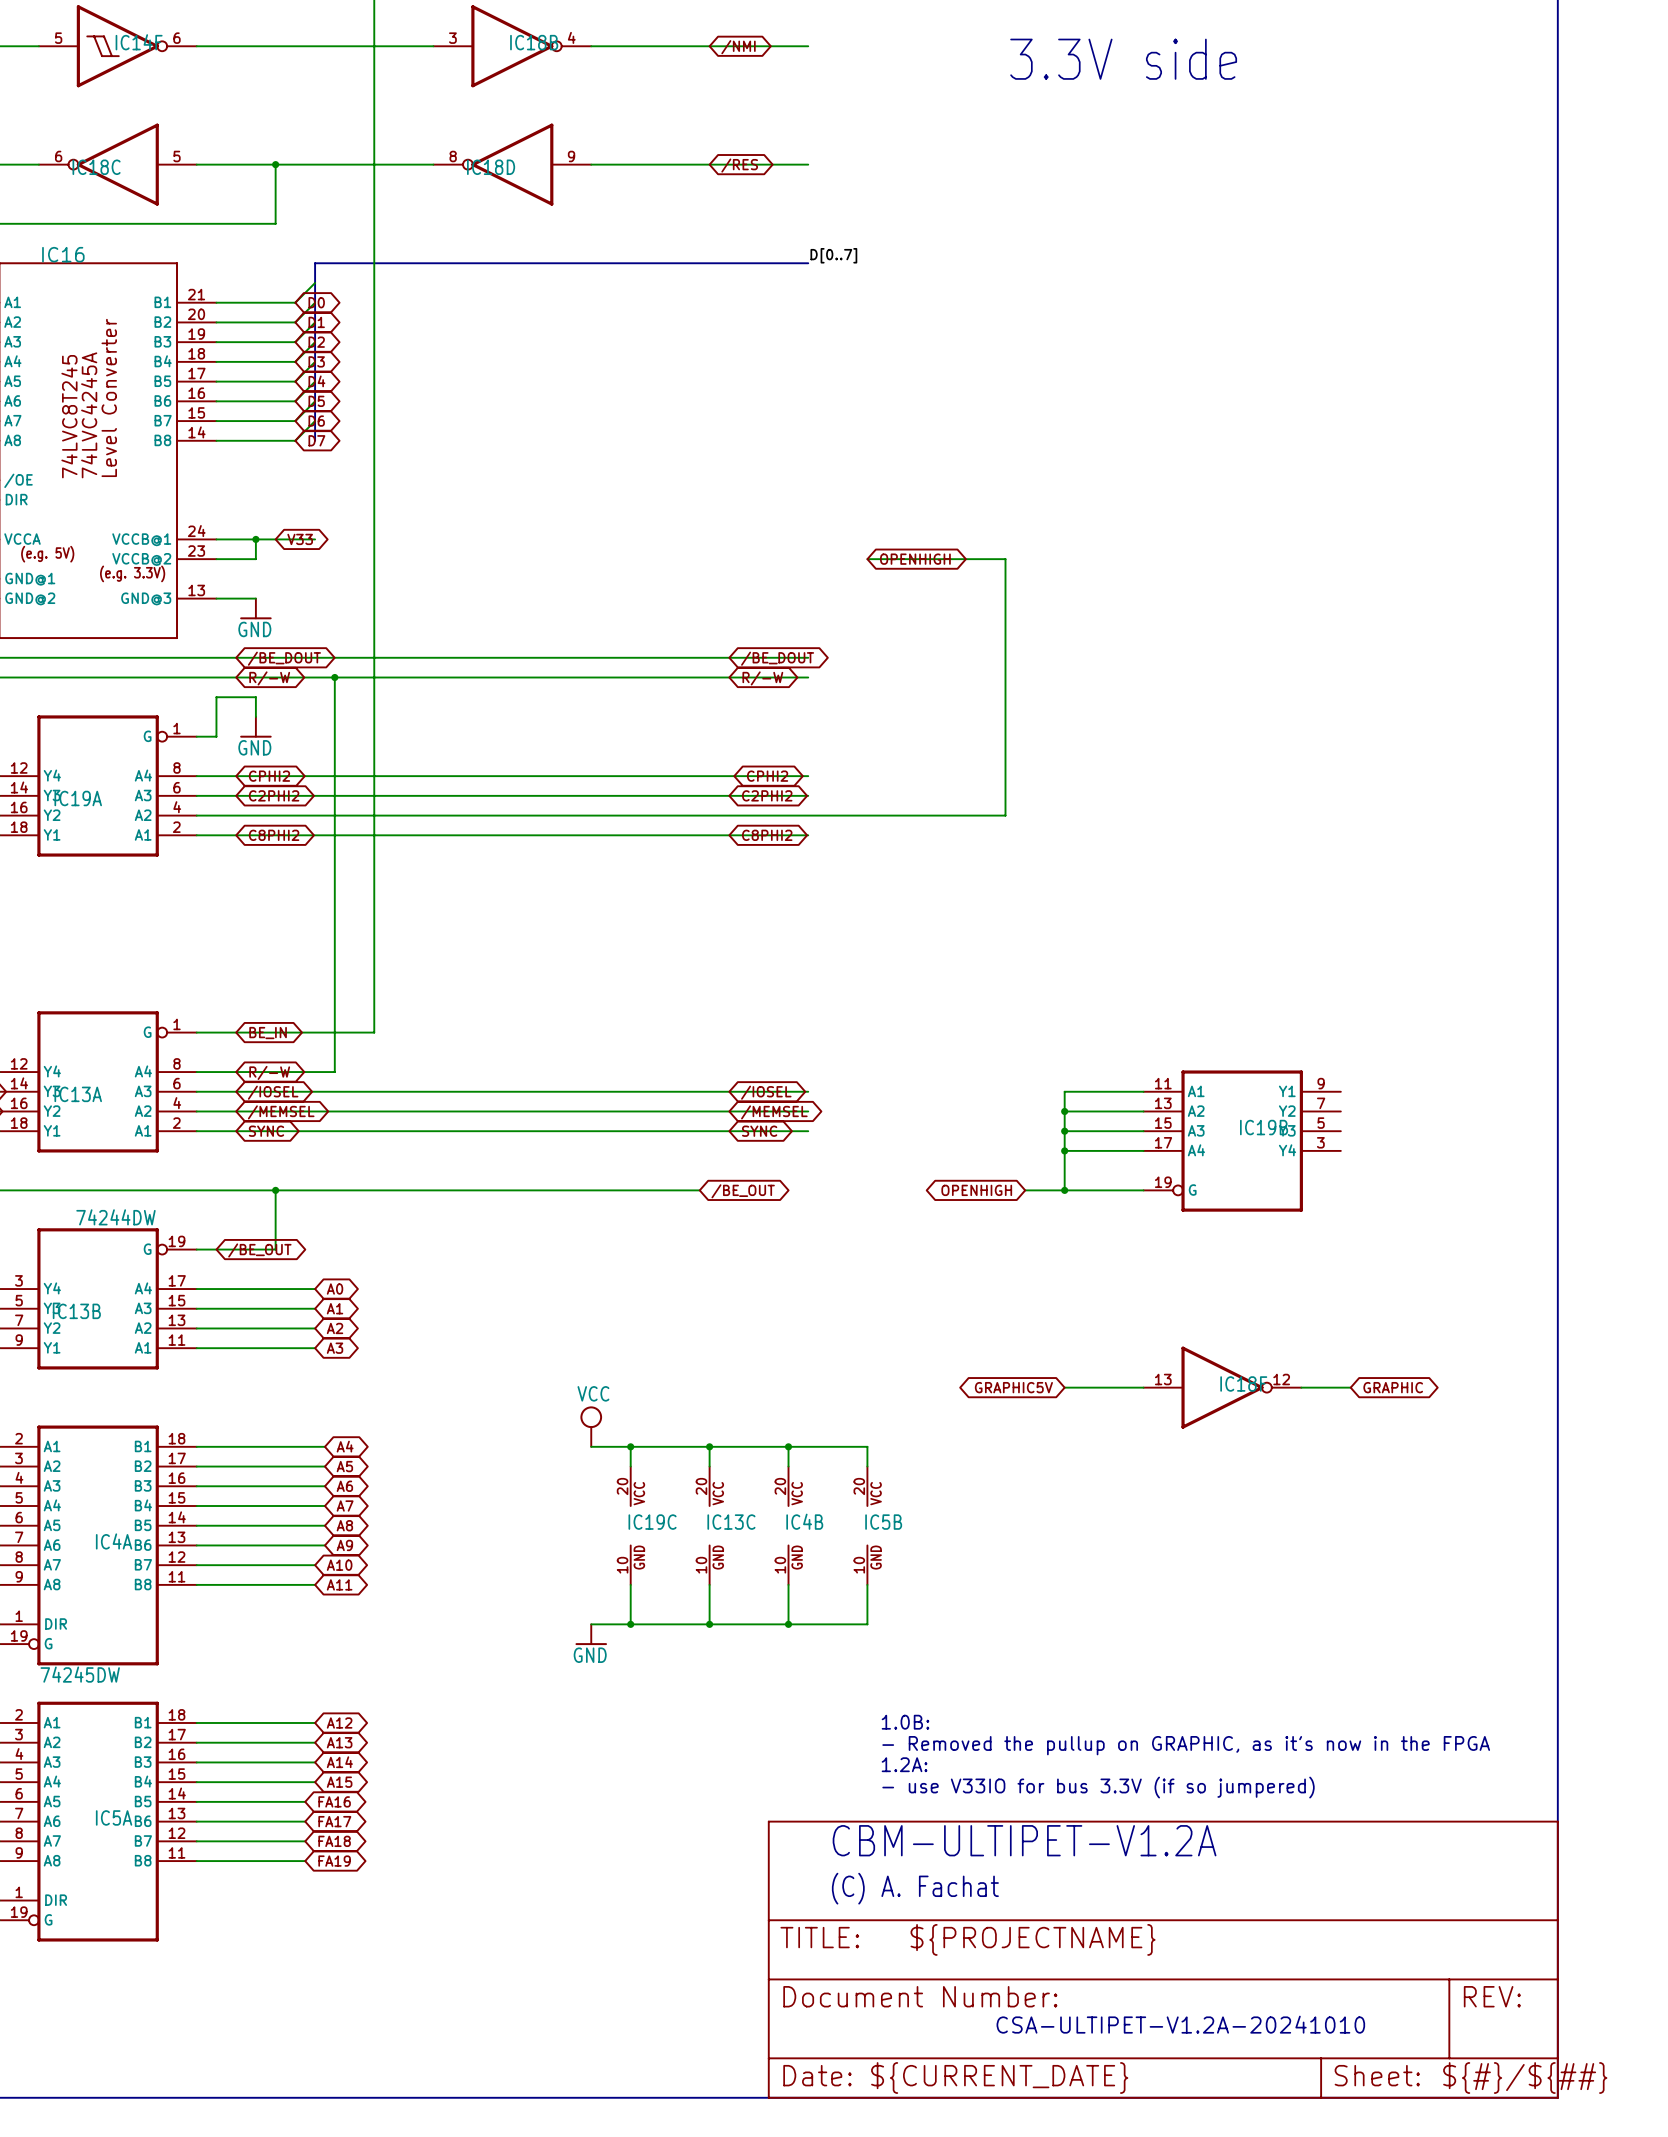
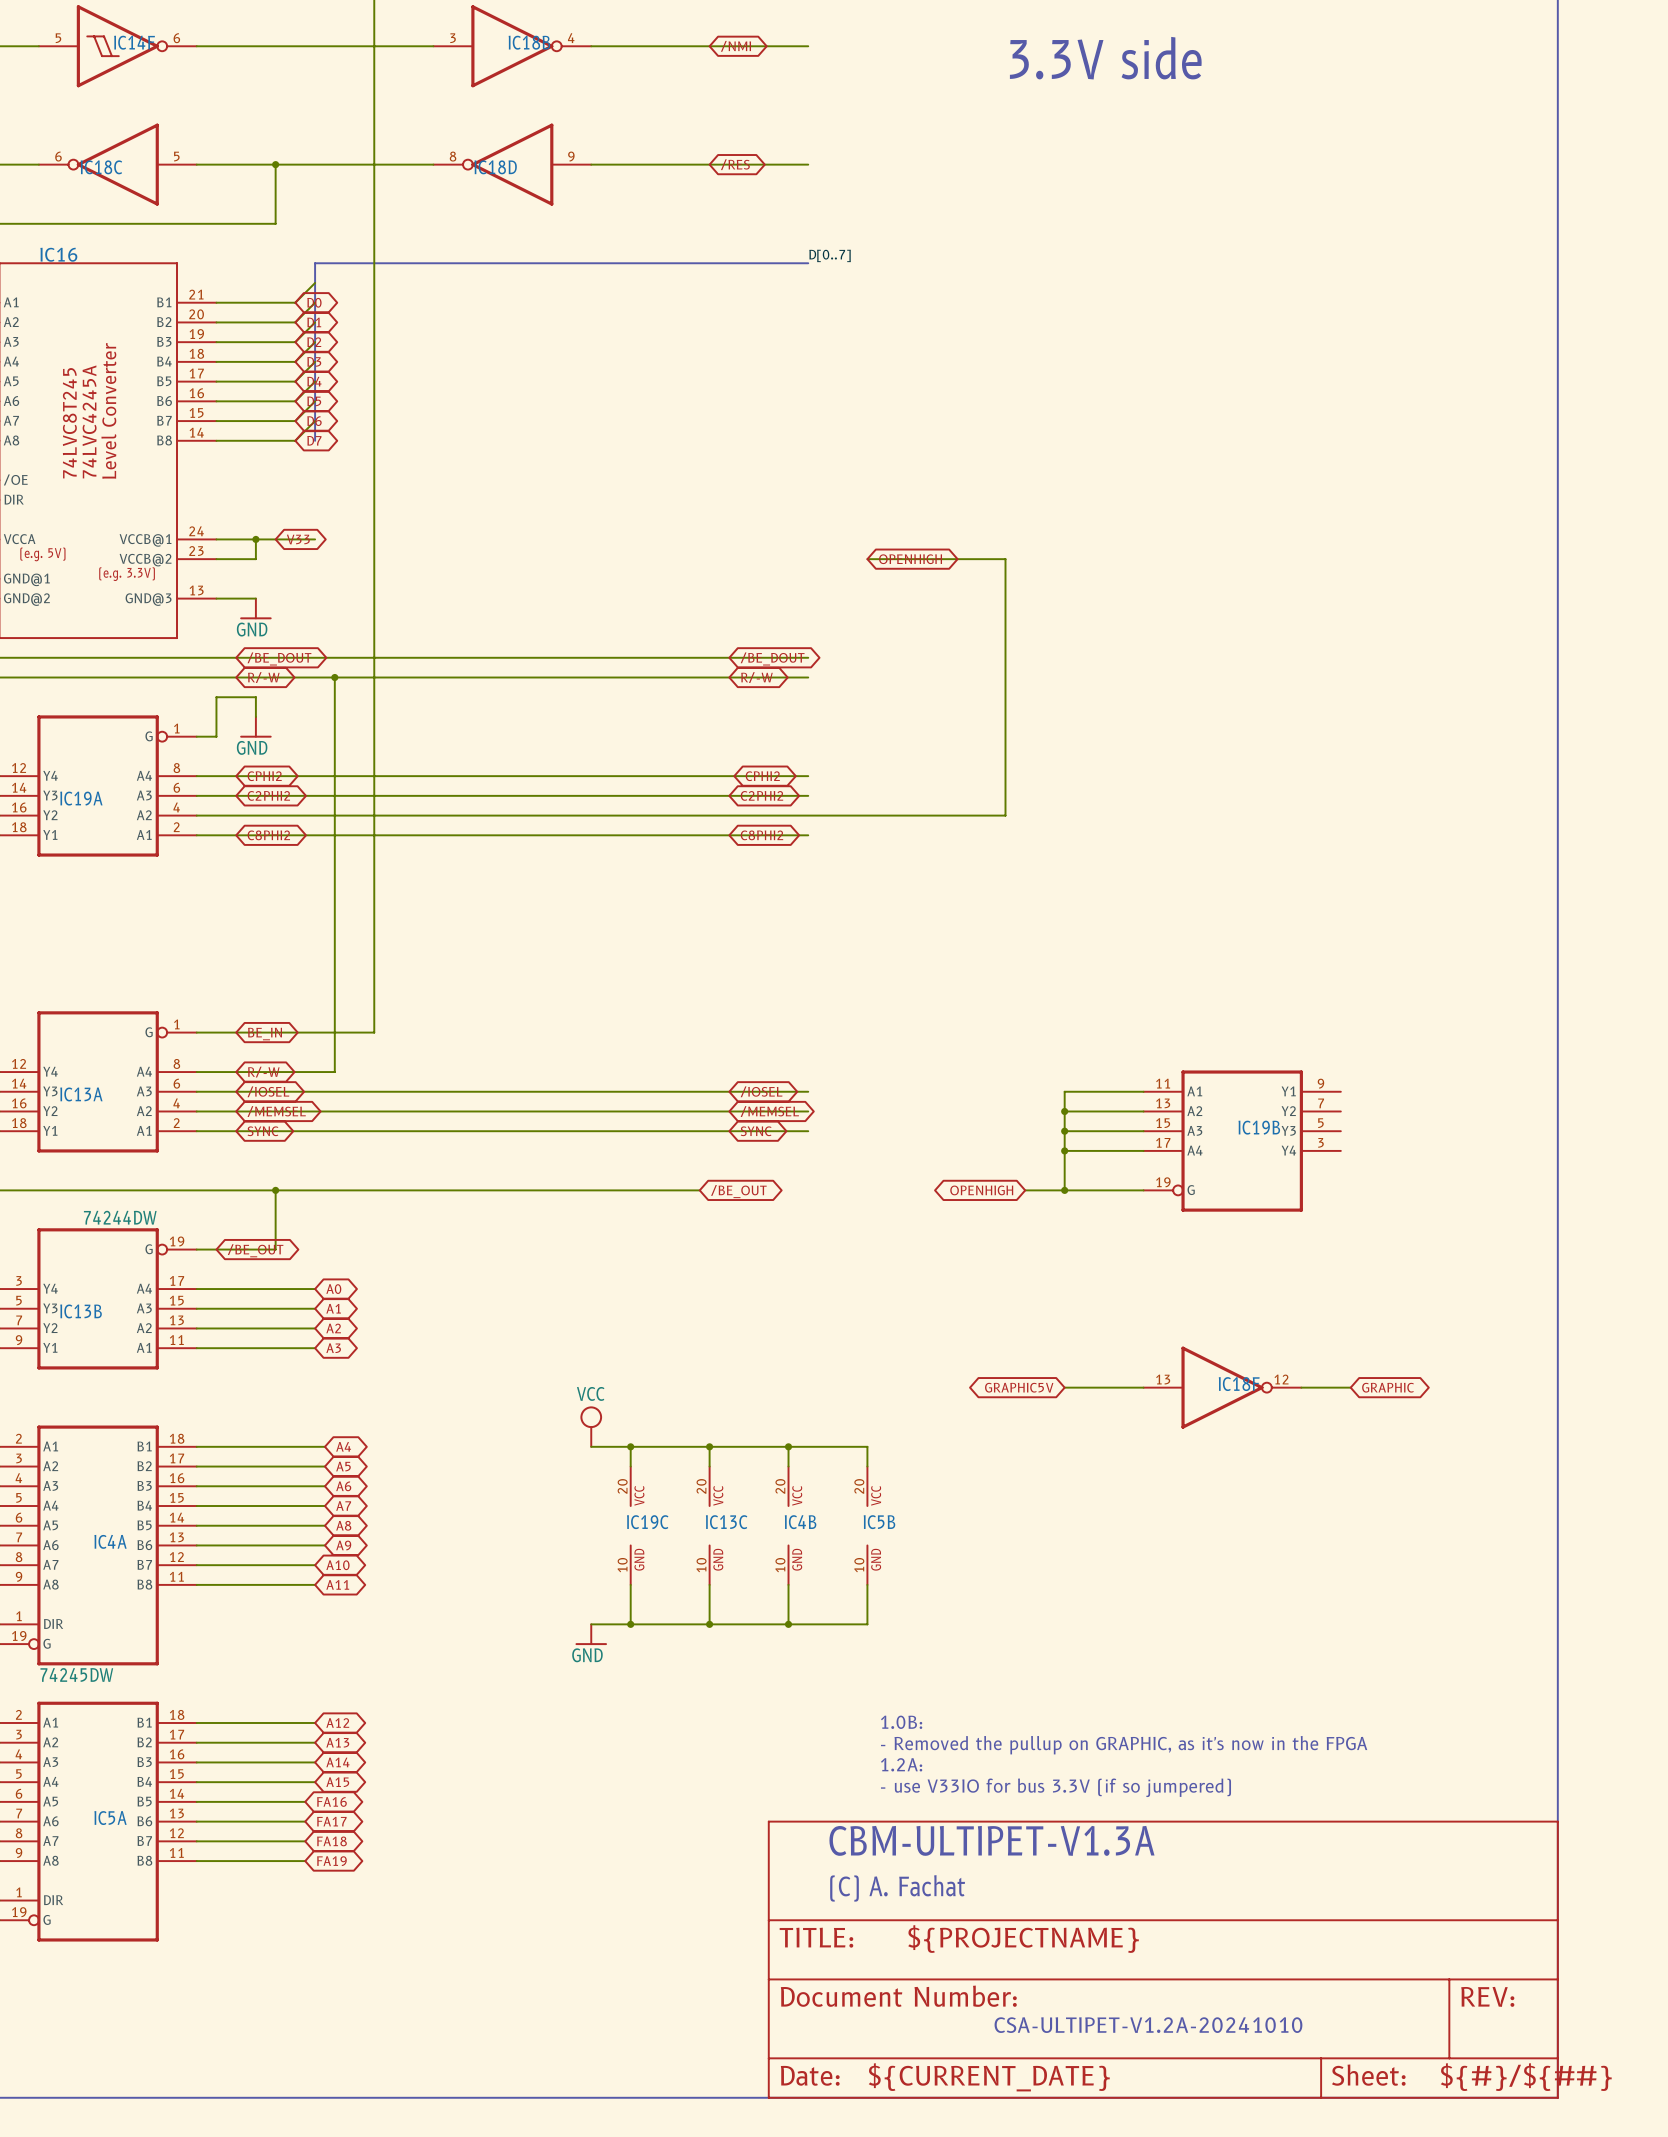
text: CBM-ULTIPET-V1.2A (1024, 1840) -> CBM-ULTIPET-V1.3A (991, 1840)

